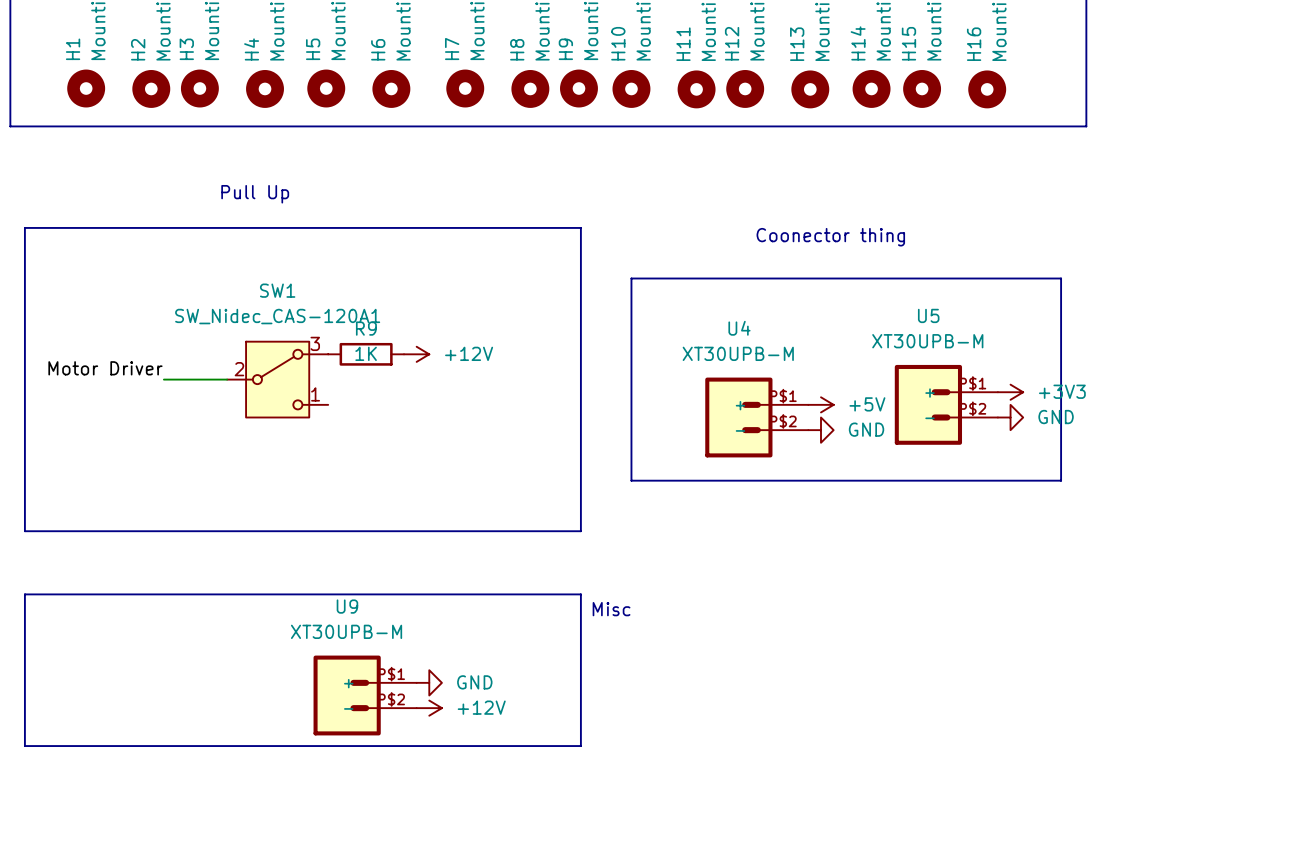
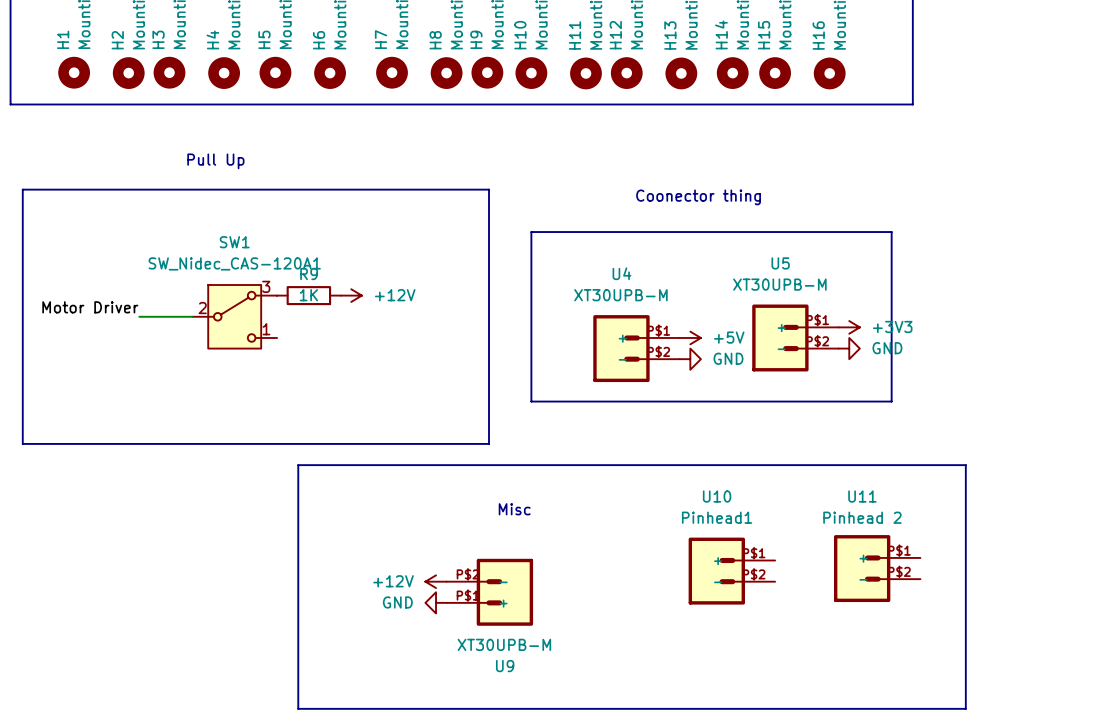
line: none -> (298, 465) (965, 465) (965, 708) (298, 708) (298, 465)
line: (24, 594) (580, 594) (580, 746) (24, 746) (24, 594) -> none
U11: none -> Pinhead 2 (877, 568)
power symbol rotation: 0° (429, 682) -> 180° (436, 602)
power symbol position: GND (429, 682) -> GND (436, 602)
U10: none -> Pinhead1 (731, 571)
U9 rotation: 0° (347, 695) -> 180° (504, 592)
U9 position: (365, 695) -> (489, 592)
power symbol rotation: 0° (429, 708) -> 180° (436, 581)
power symbol position: +12V (429, 708) -> +12V (436, 581)

